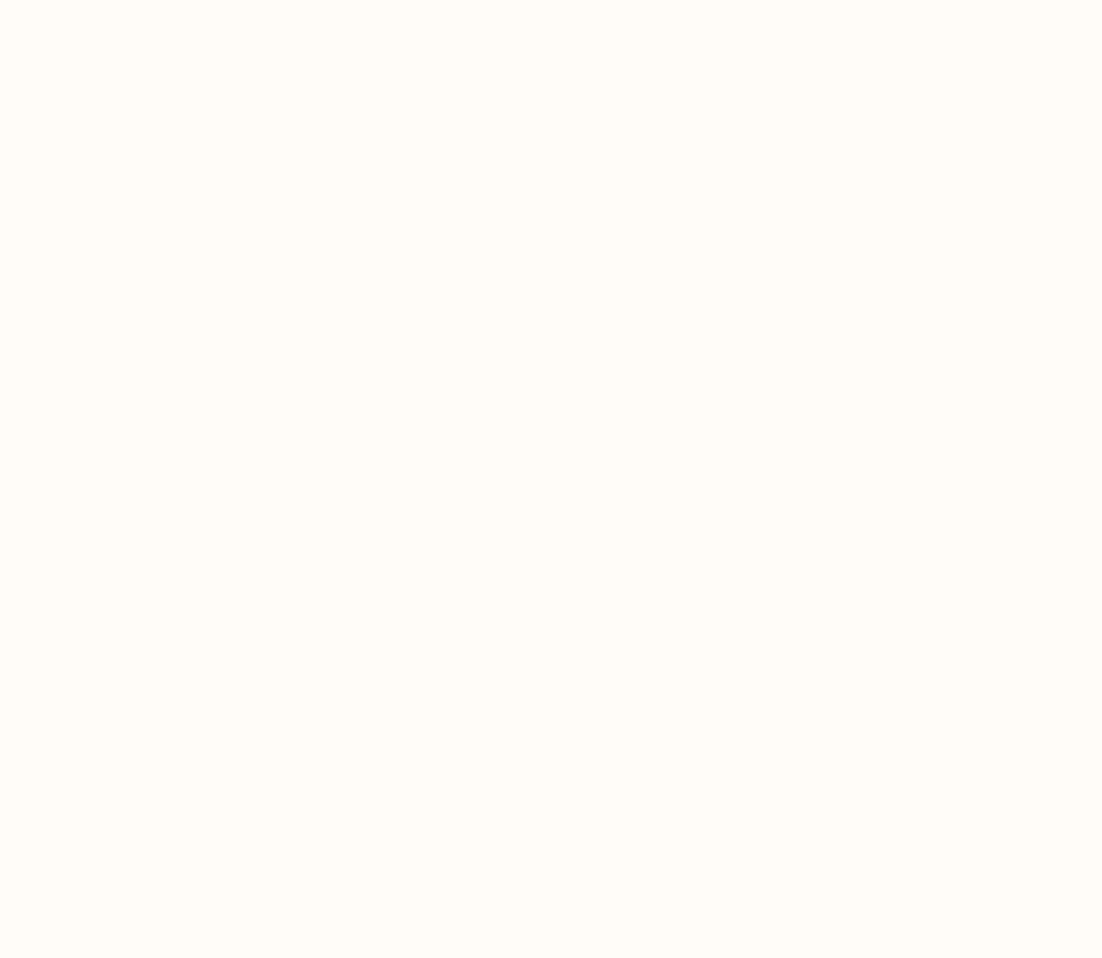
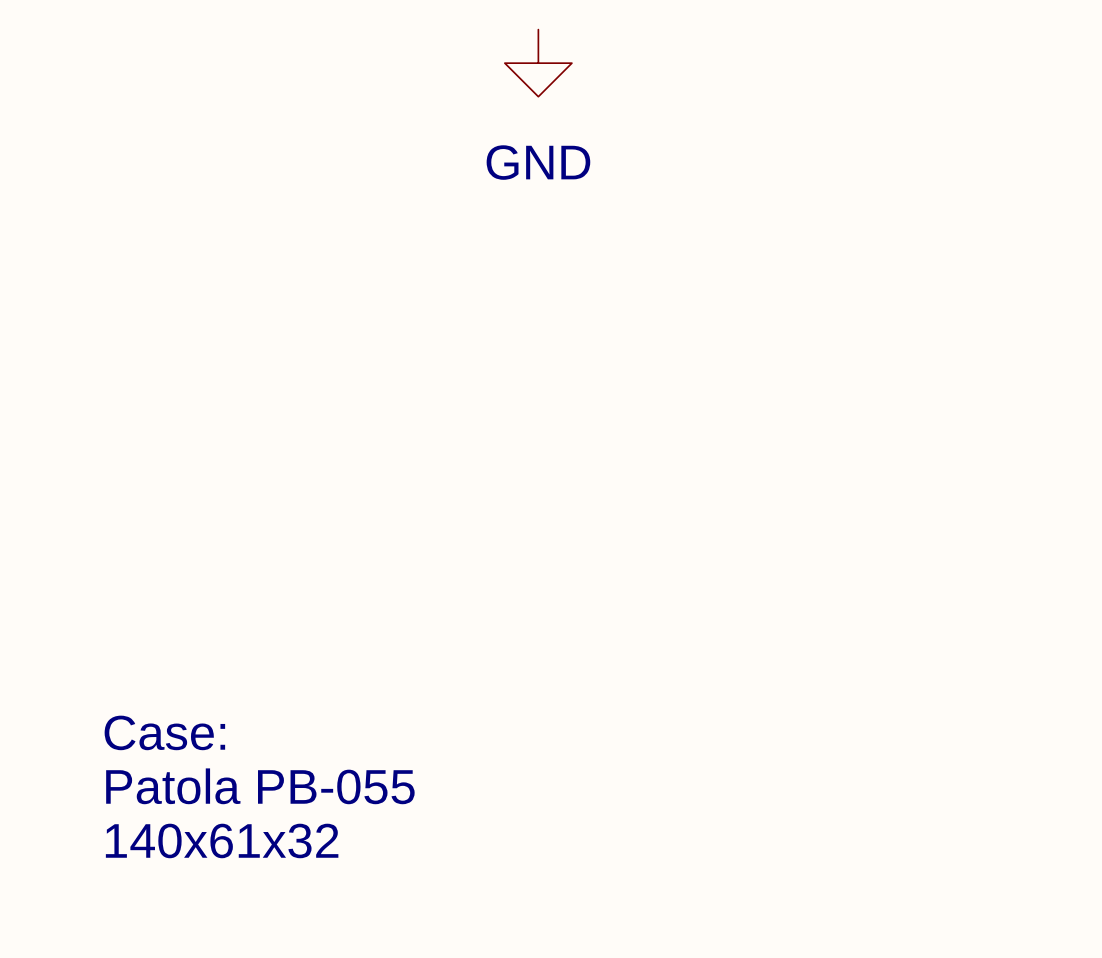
power symbol: none -> GND (538, 63)
text: none -> Case: (164, 732)
text: none -> Patola PB-055 (260, 786)
text: none -> 140x61x32 (222, 840)

